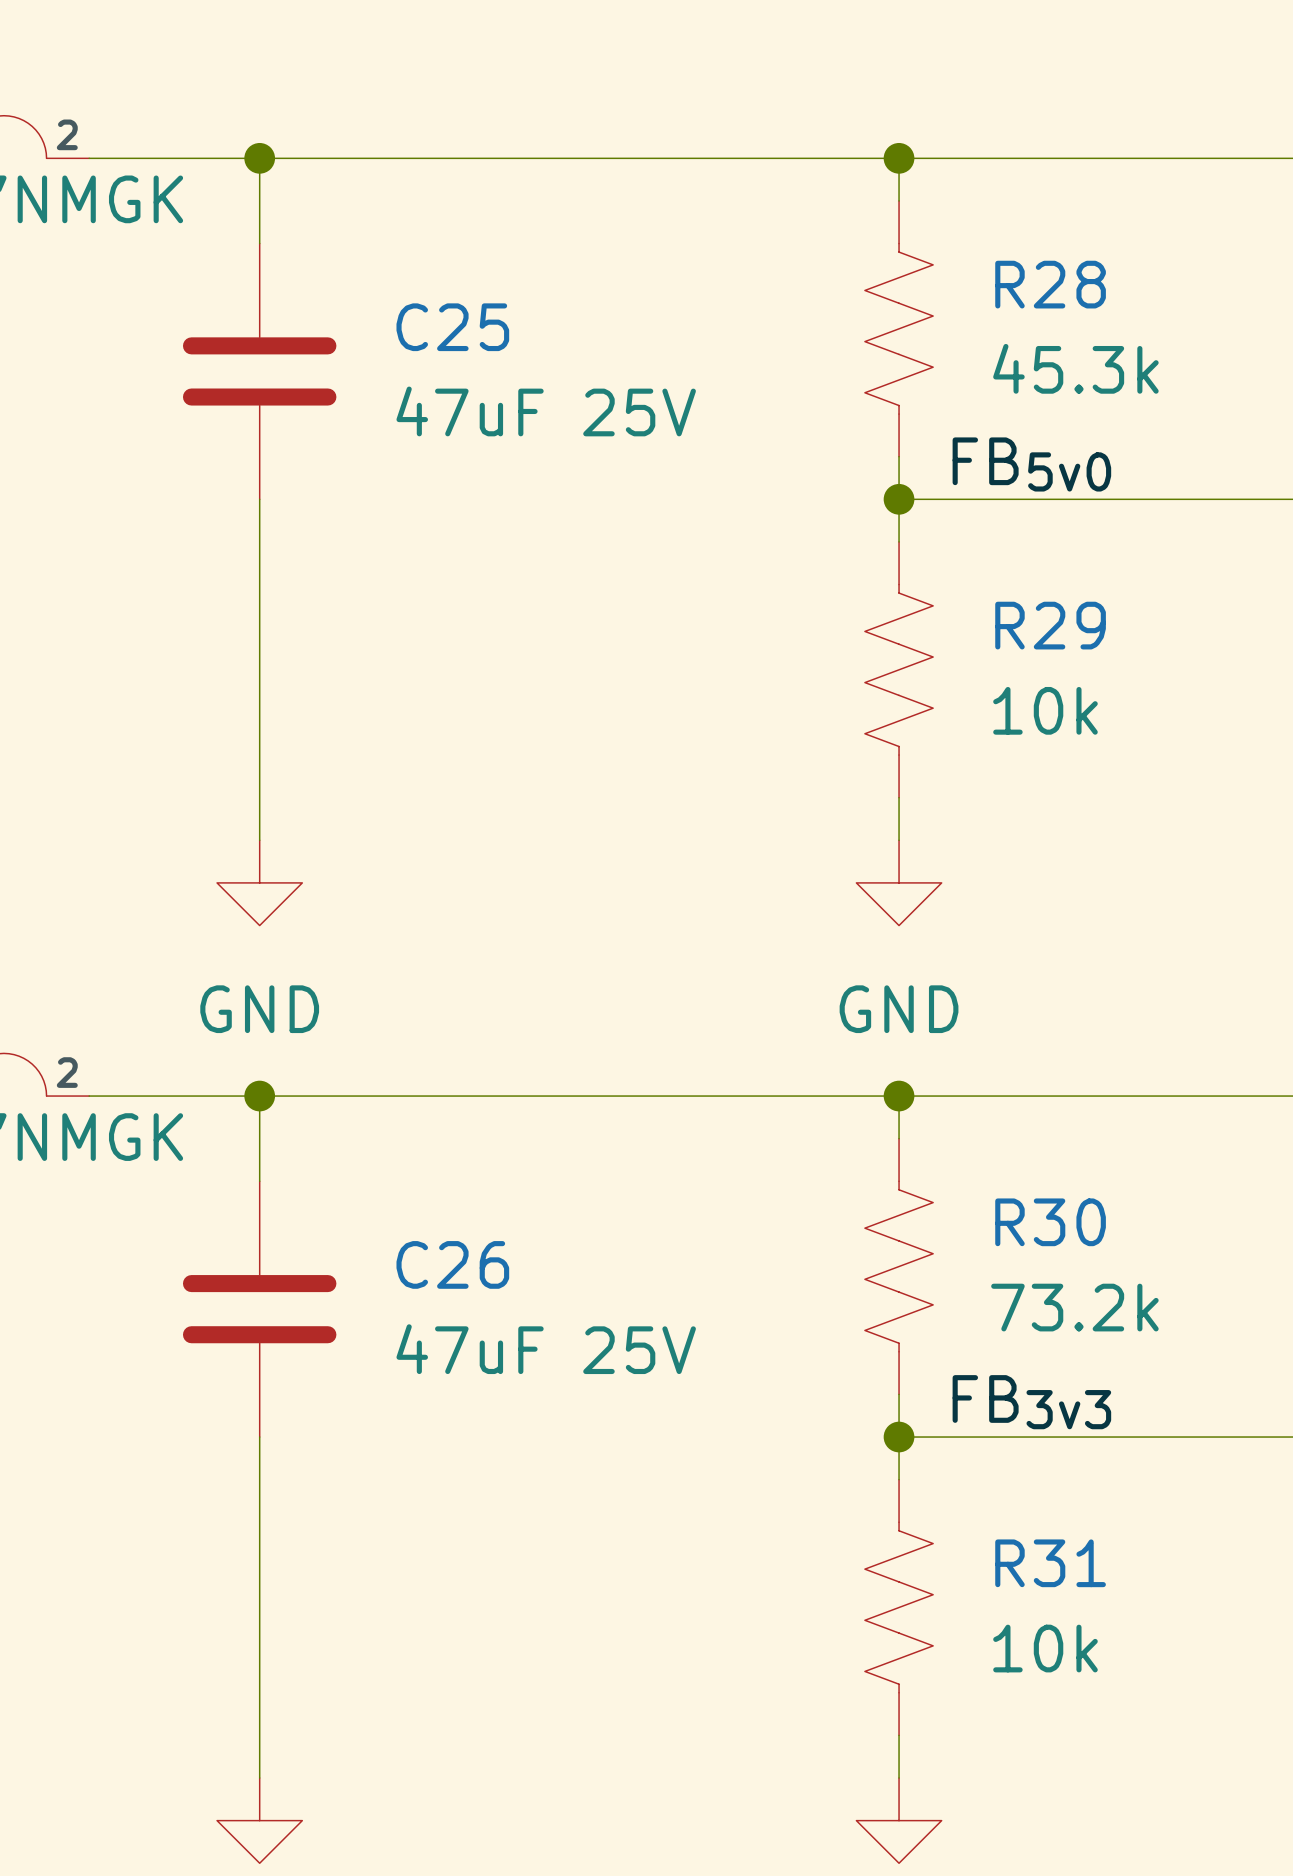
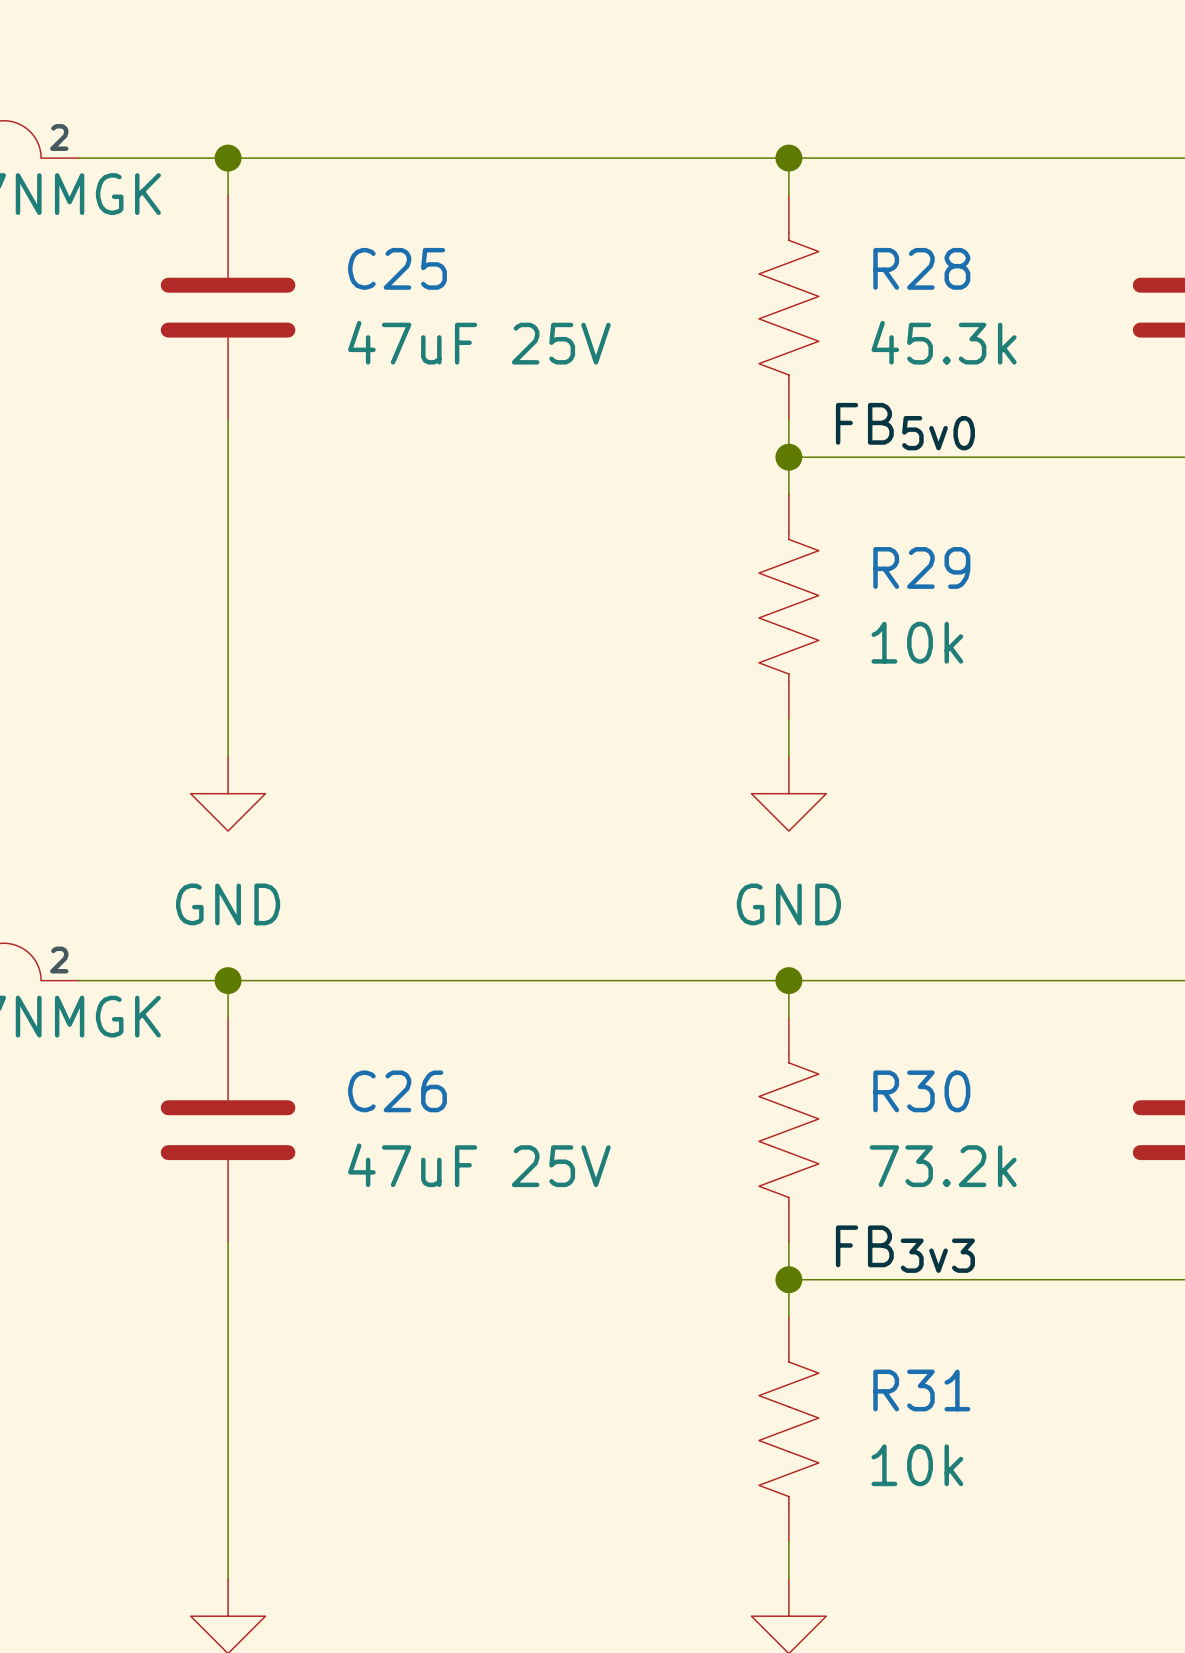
C25 position: (259, 371) -> (228, 307)
C26 position: (259, 1309) -> (228, 1130)

